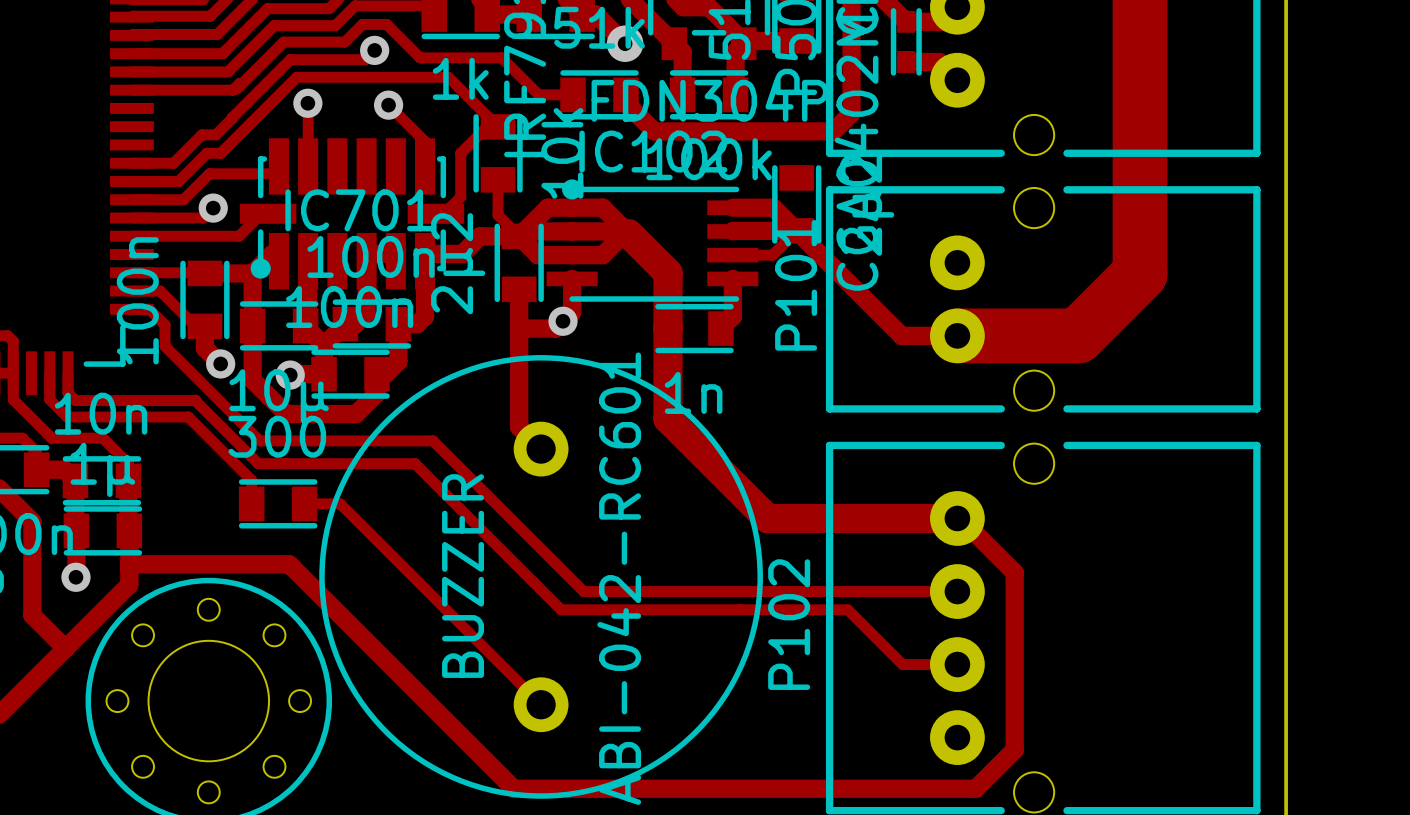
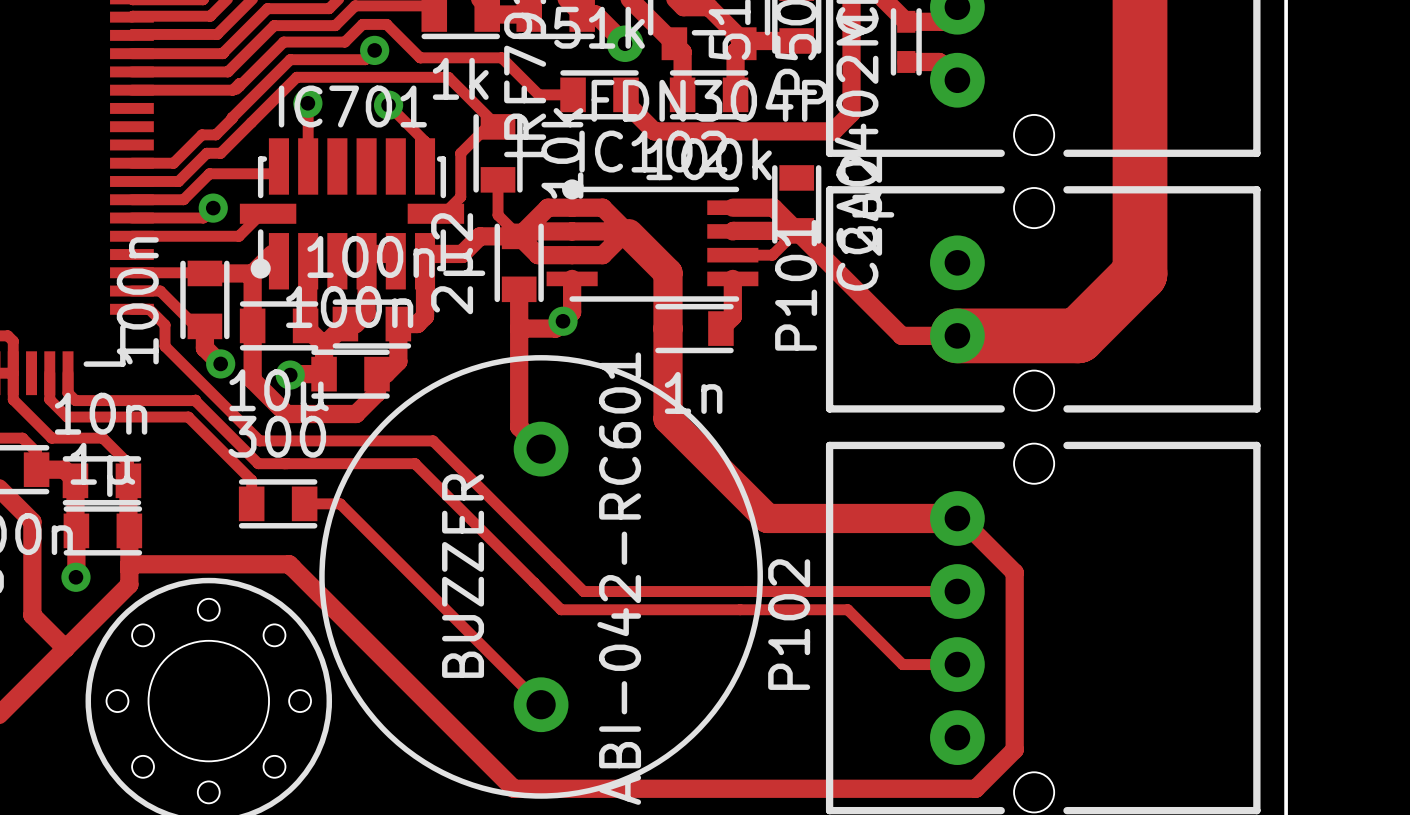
IC701 name position: IC701 (359, 210) -> IC701 (352, 106)

